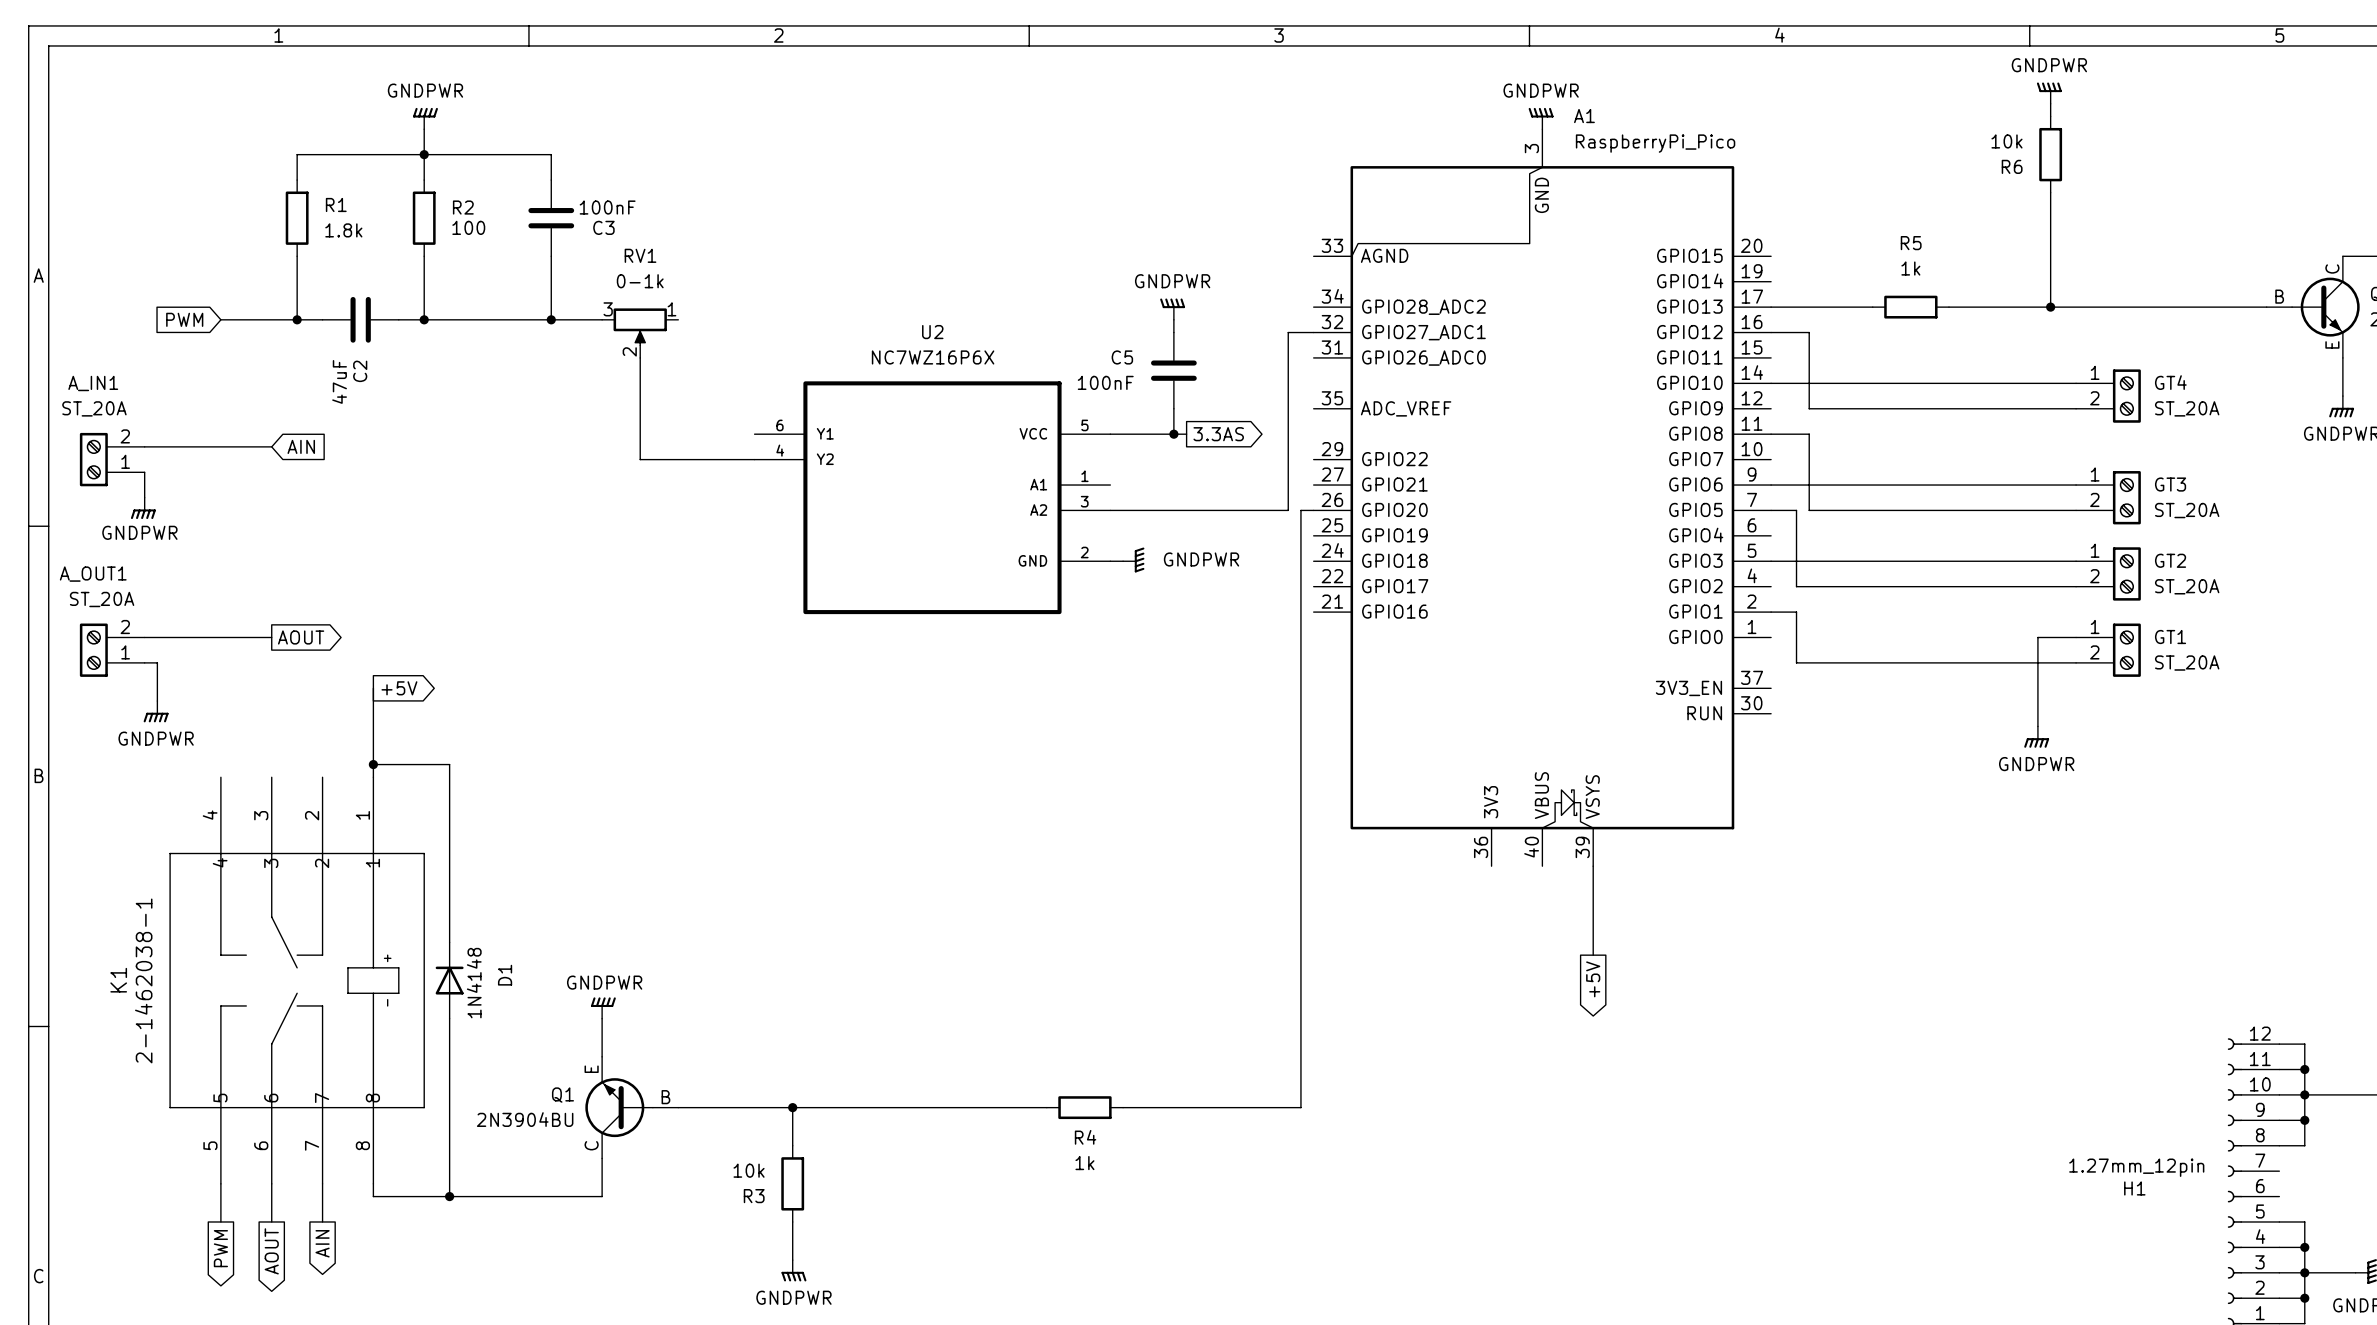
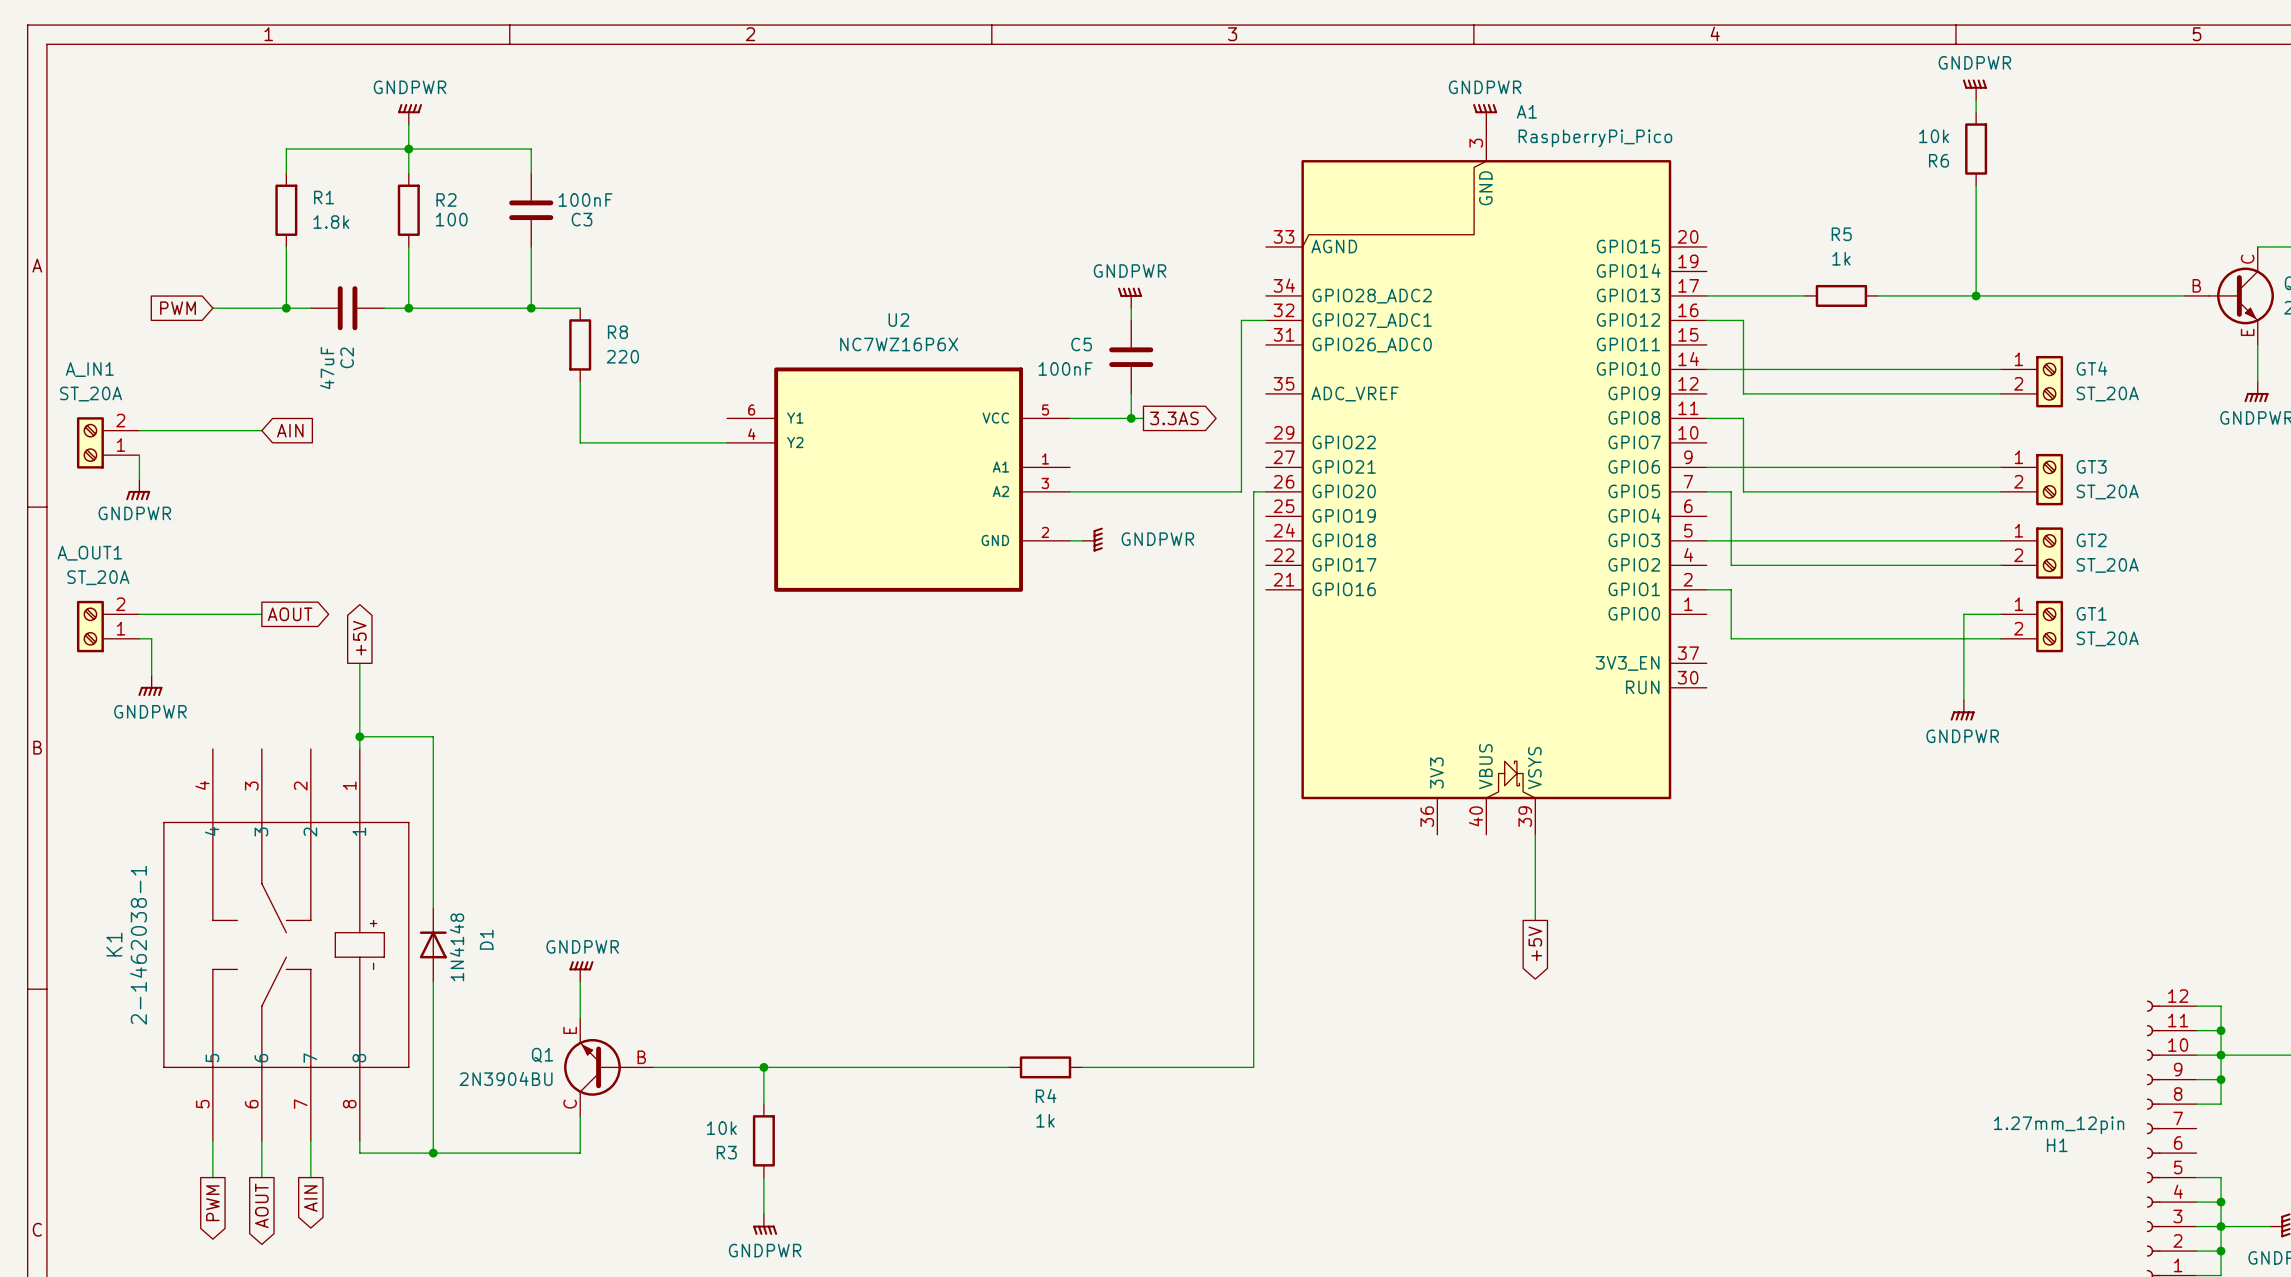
RV1: 0-1k (640, 333) -> none
R8: none -> 220 (580, 344)
wire: (640, 357) (640, 459) -> (580, 381) (580, 442) (616, 442)
global label rotation: 0° (399, 688) -> 90° counterclockwise (359, 638)

